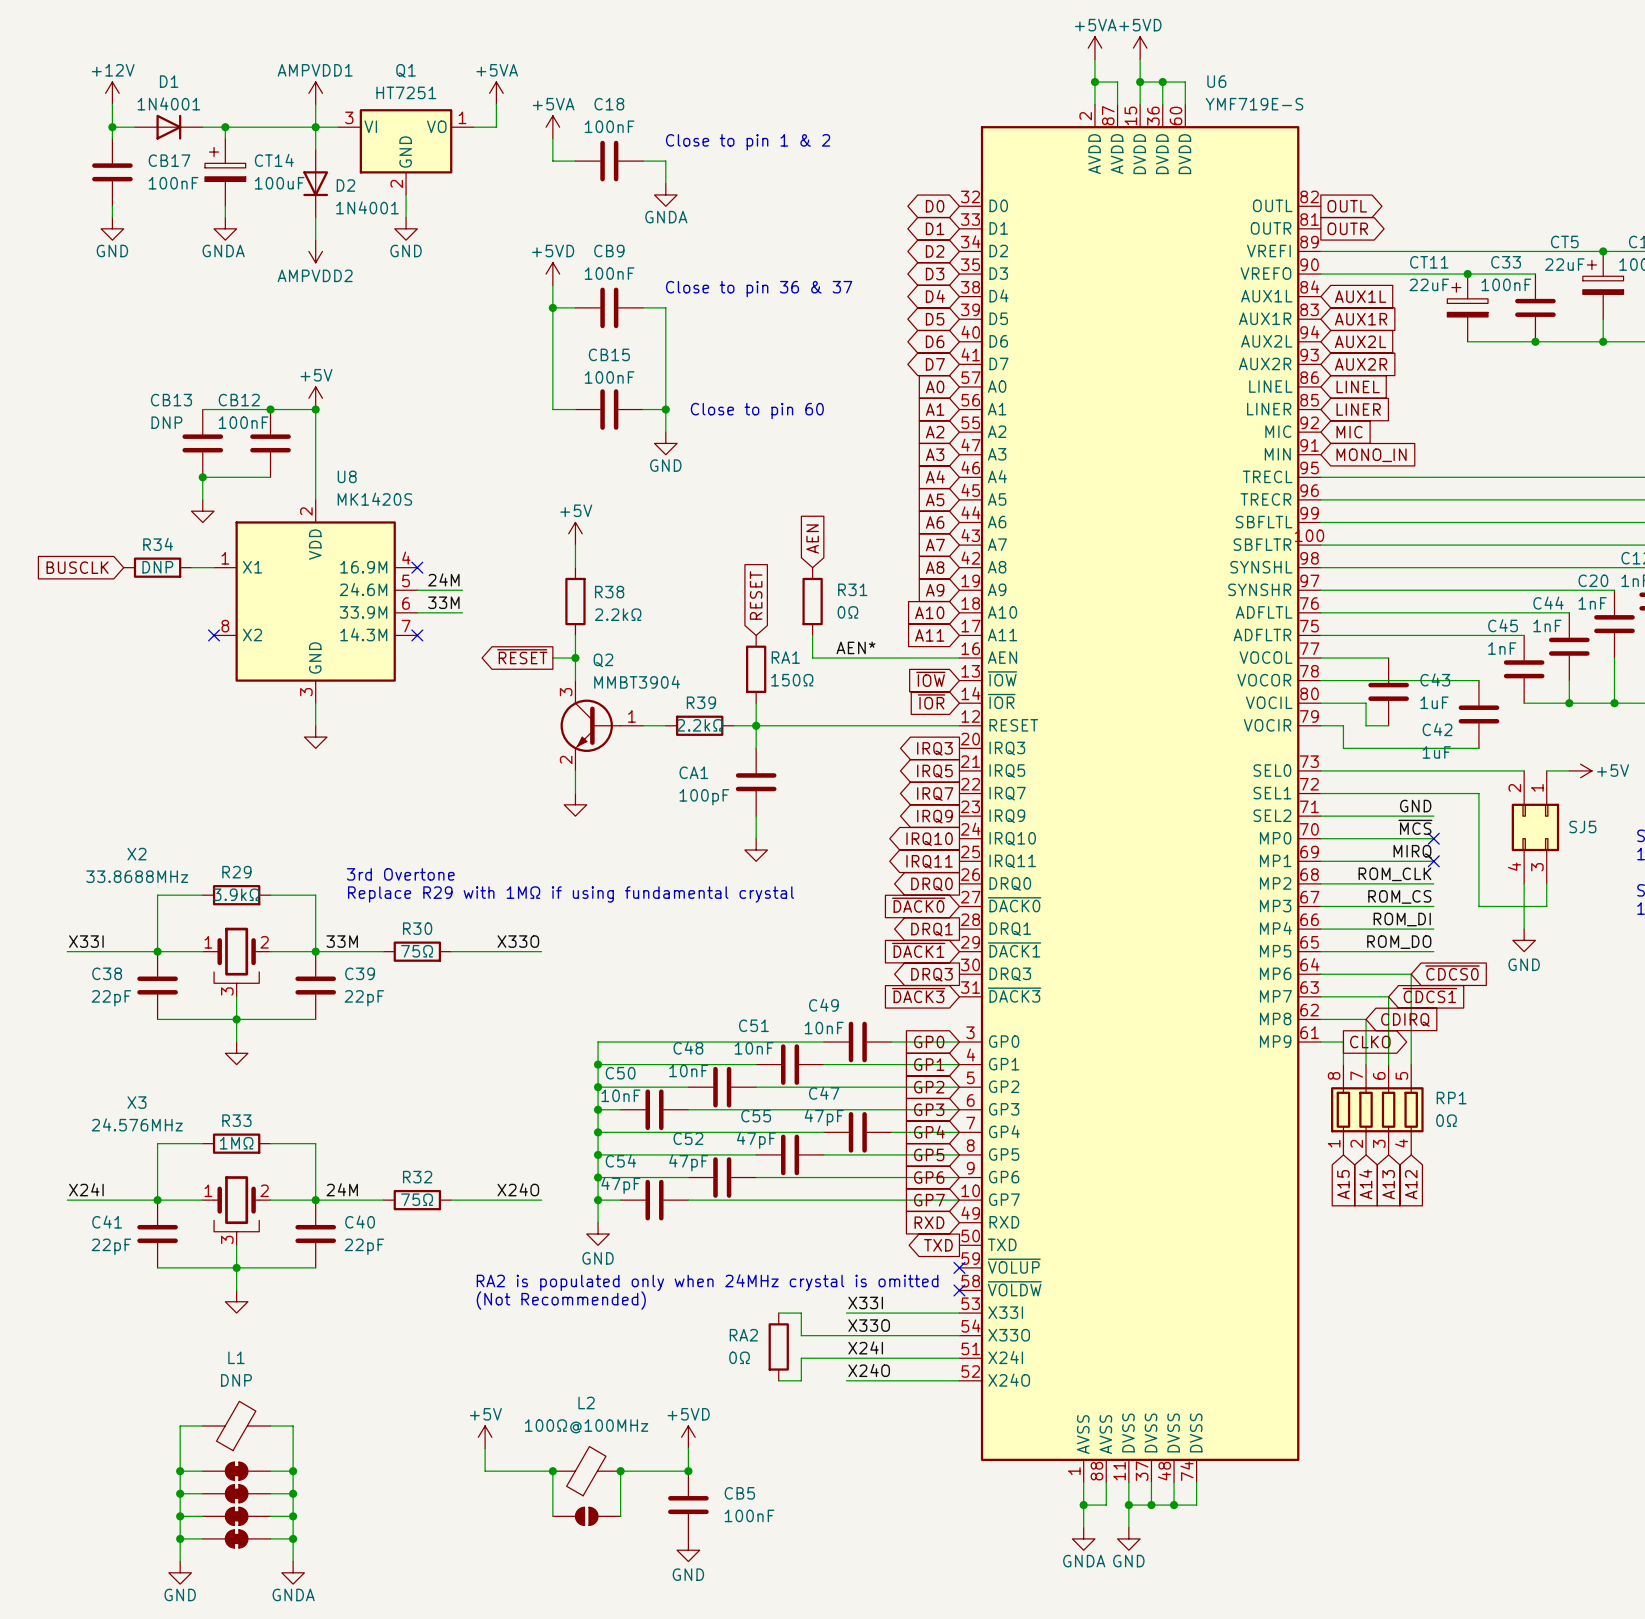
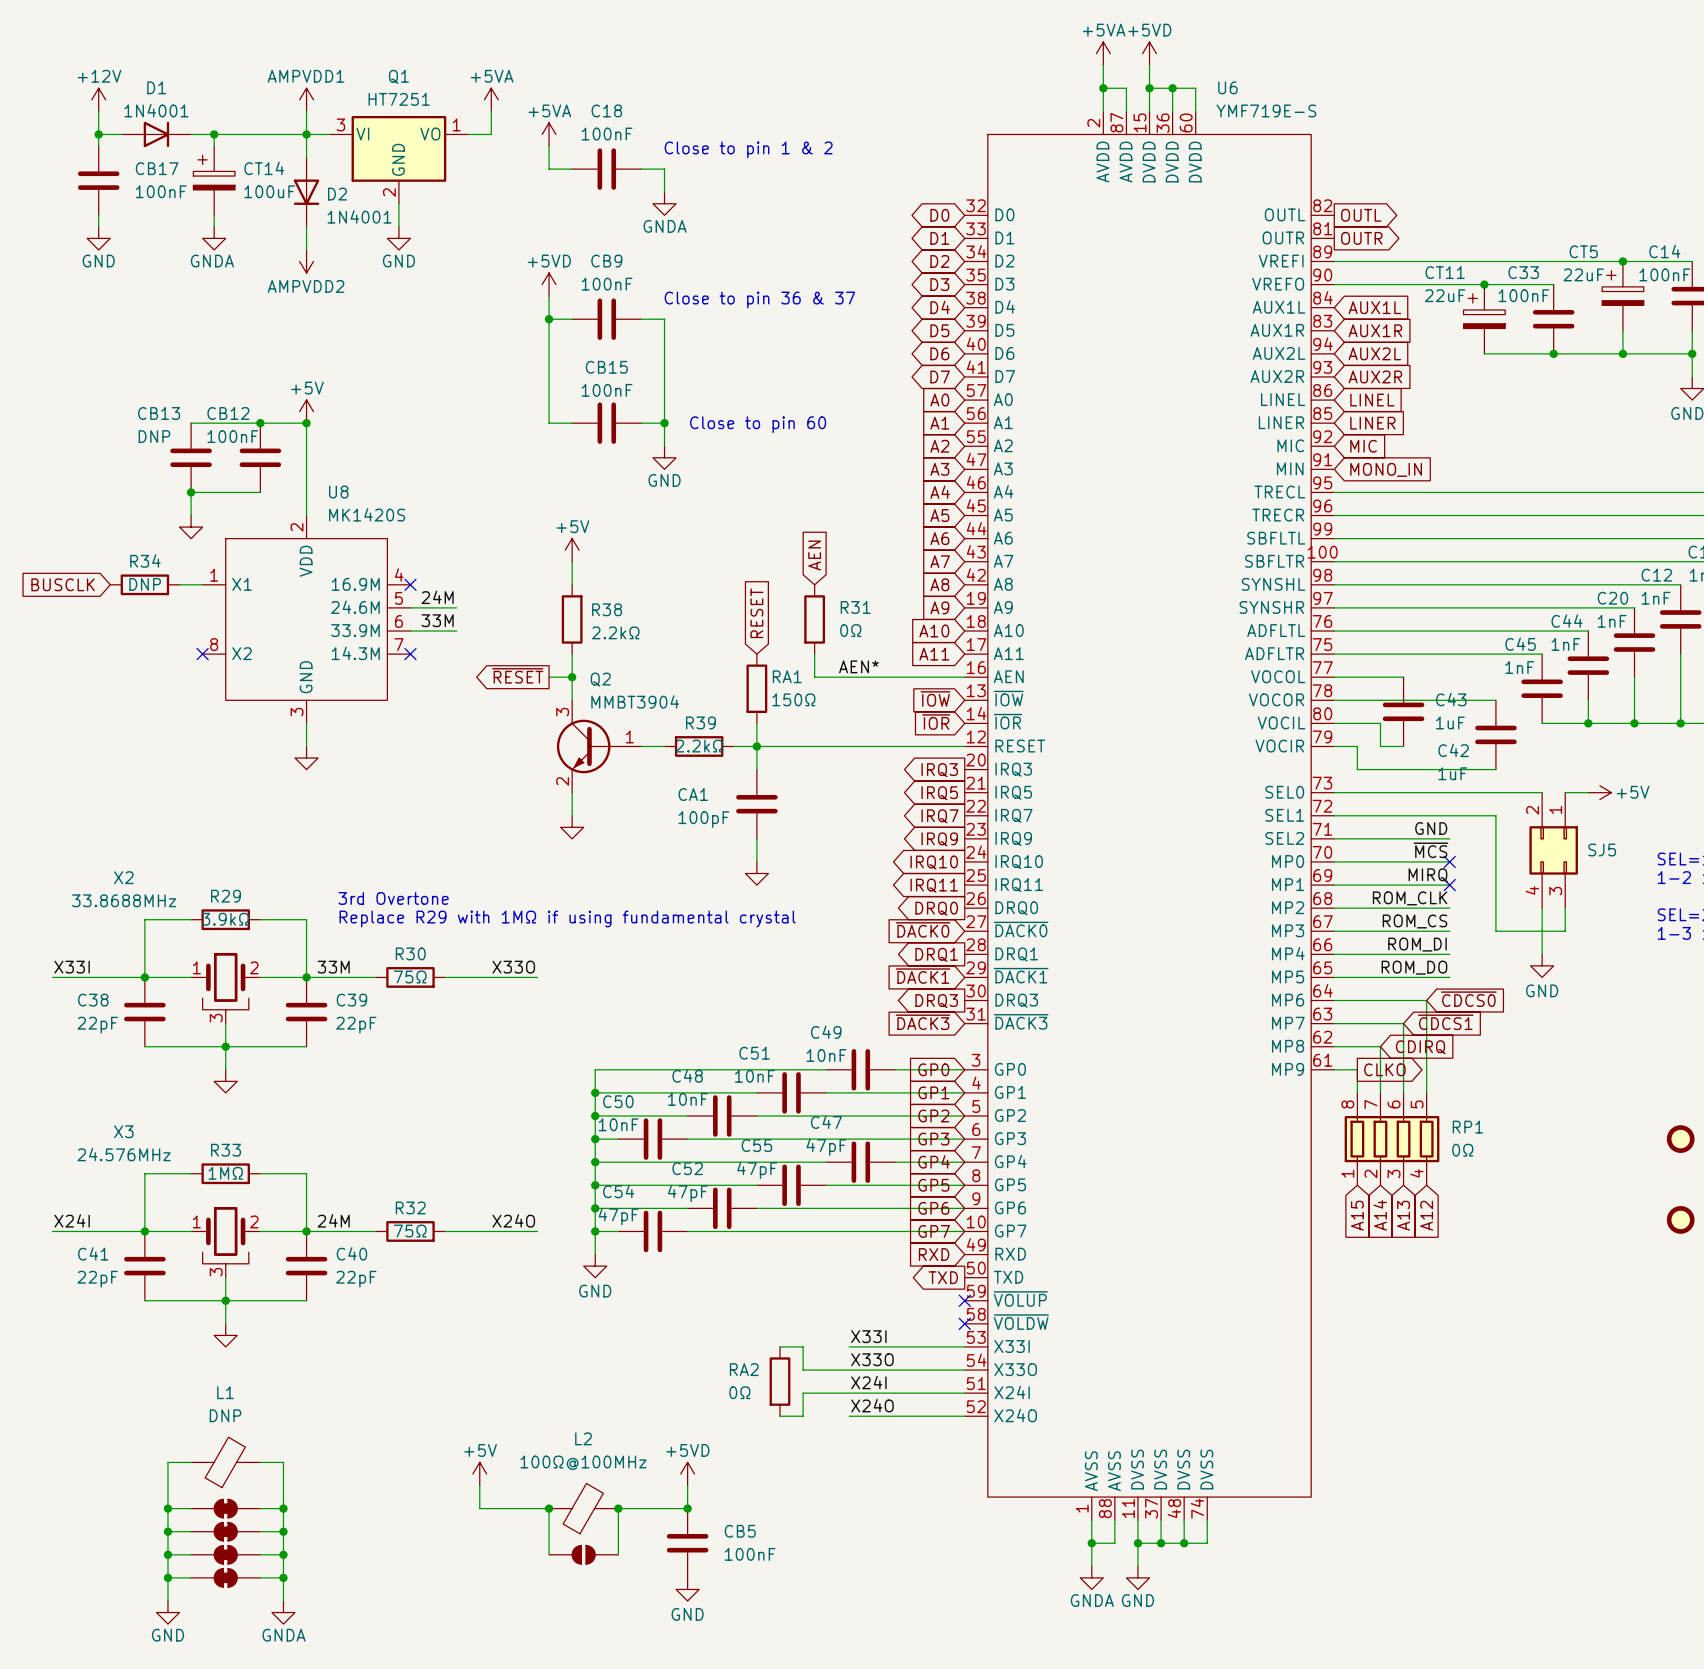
U6 symbol: [959, 104, 1321, 1483] -> [964, 111, 1335, 1521]
U8 symbol: [214, 499, 418, 704] -> [202, 515, 411, 724]
text: RA2 is populated only when 24MHz crystal is omitted (707, 1282) -> none
text: (Not Recommended) (561, 1300) -> none

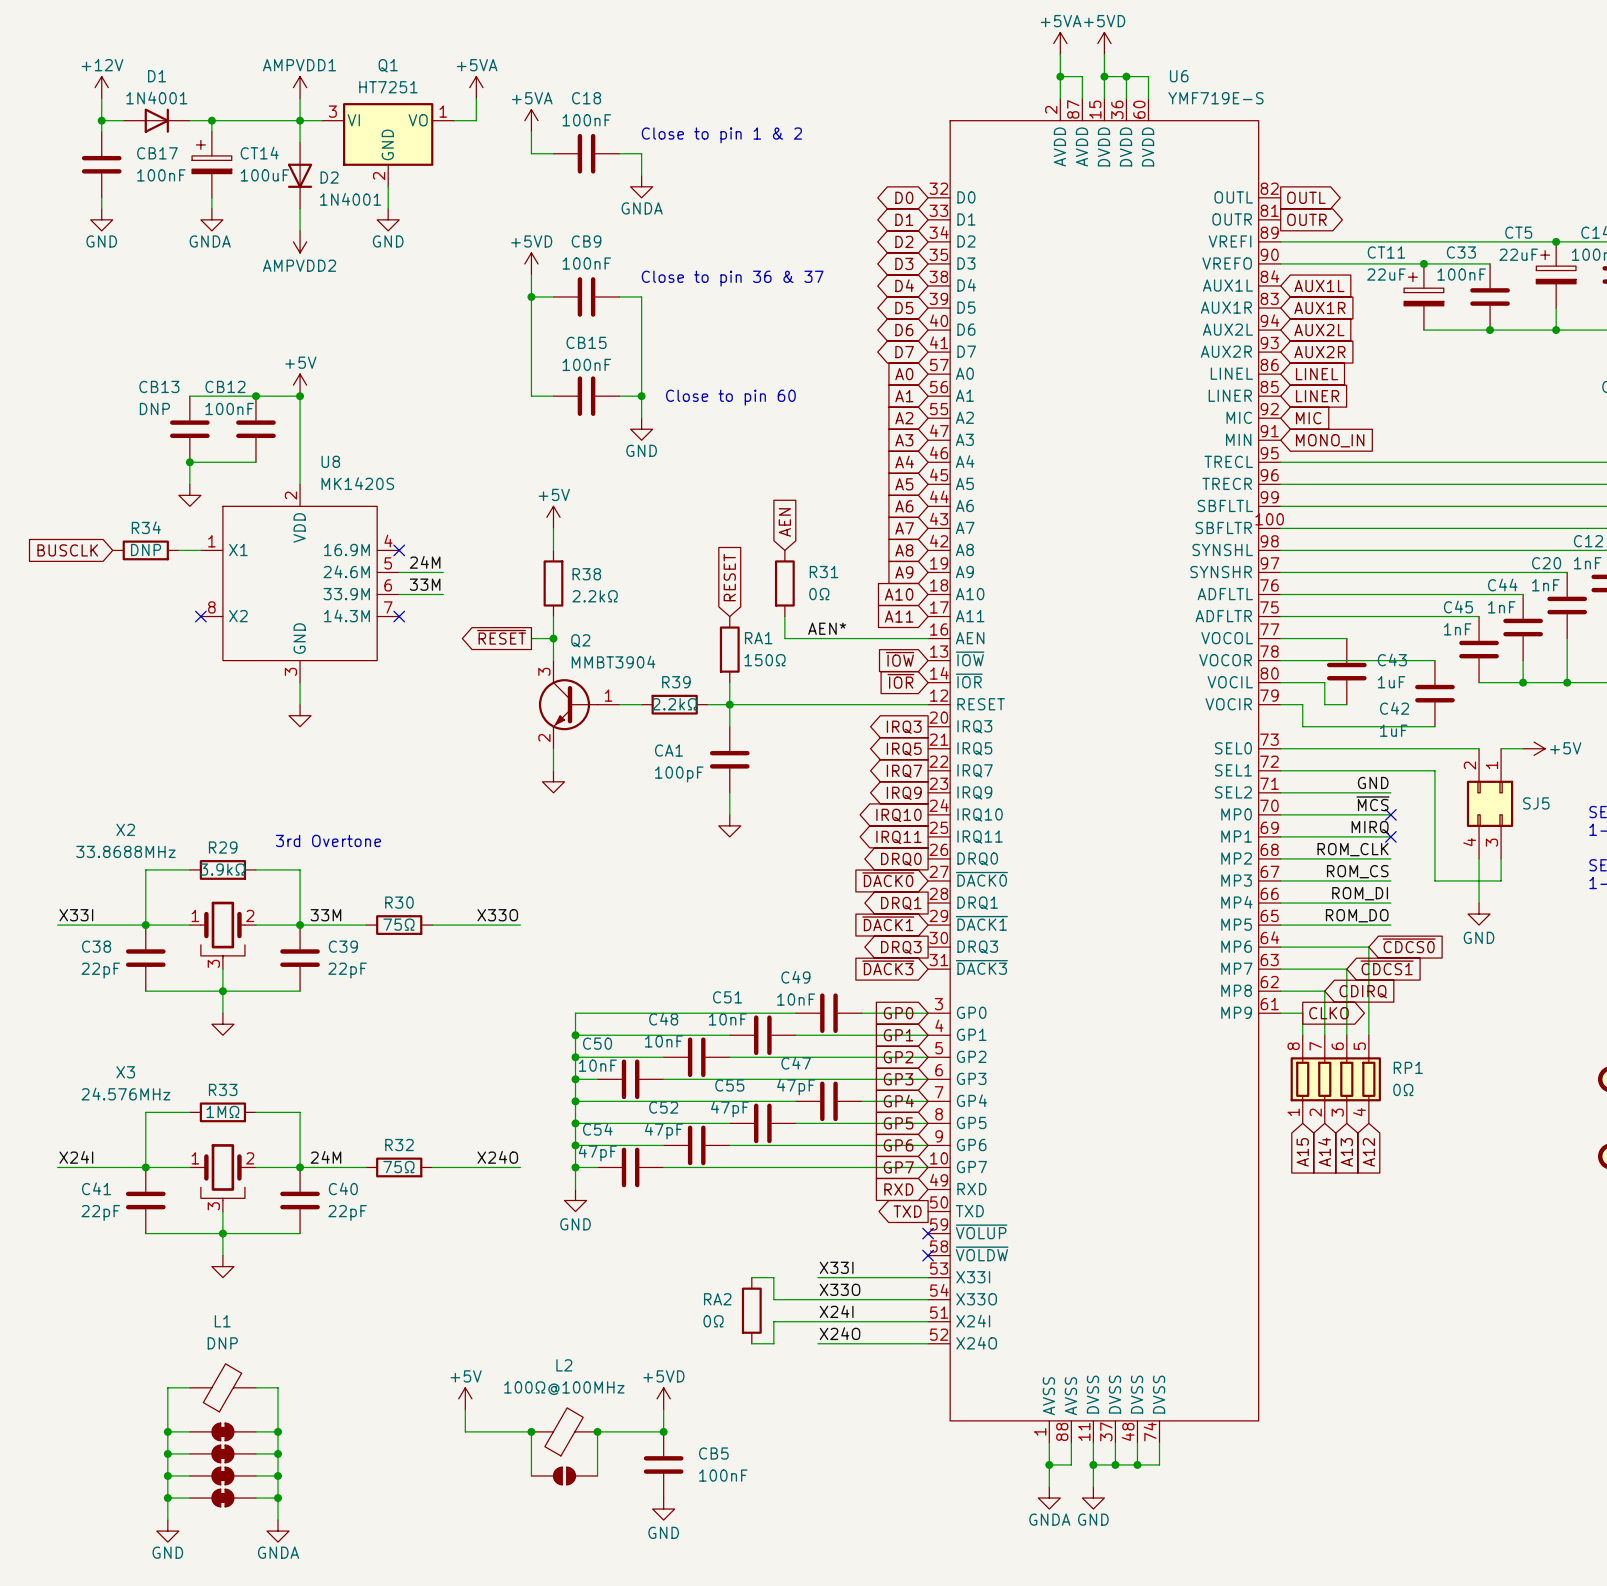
text position: 3rd Overtone (393, 898) -> 3rd Overtone (328, 840)
text: Replace R29 with 1MΩ if using fundamental crystal (567, 918) -> none

